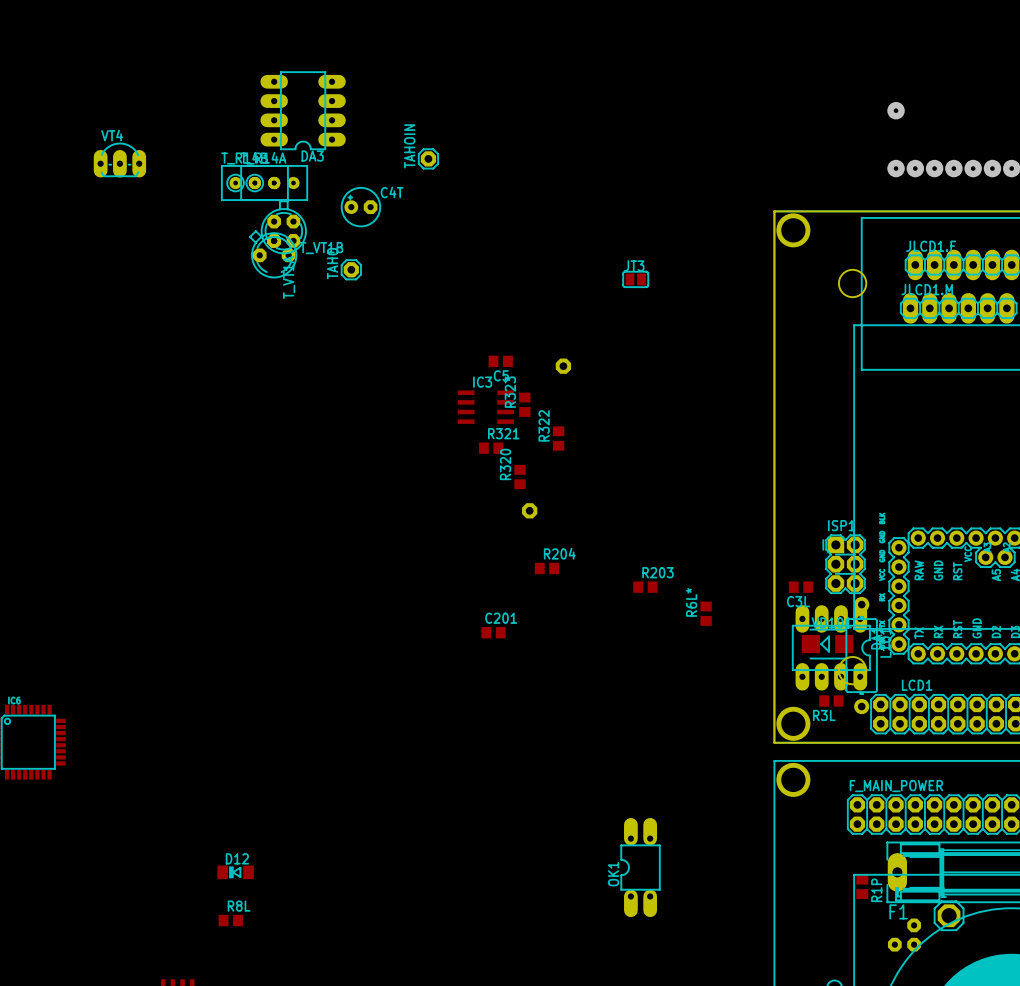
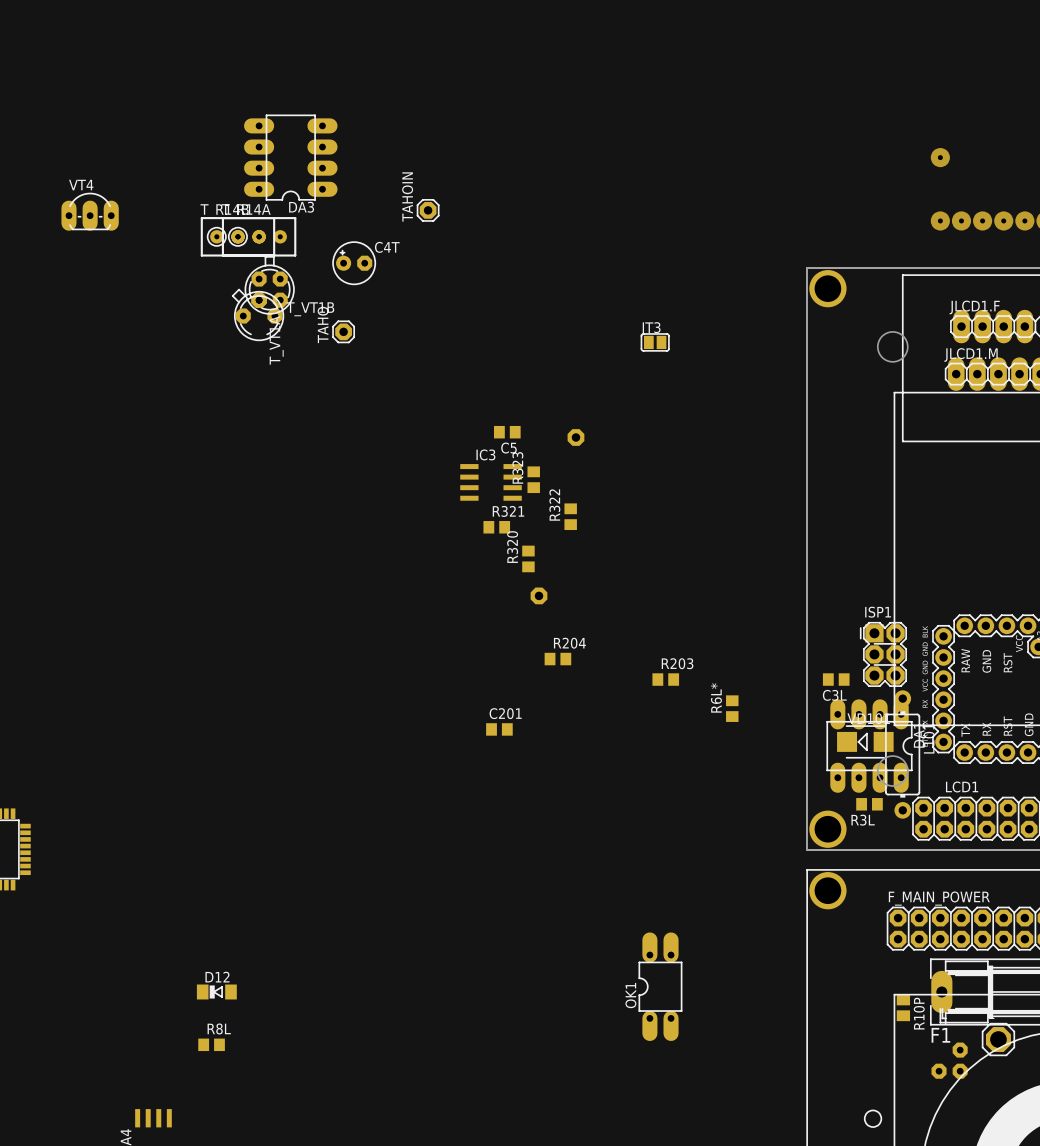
R1P name: R1P (876, 890) -> R10P (919, 1013)

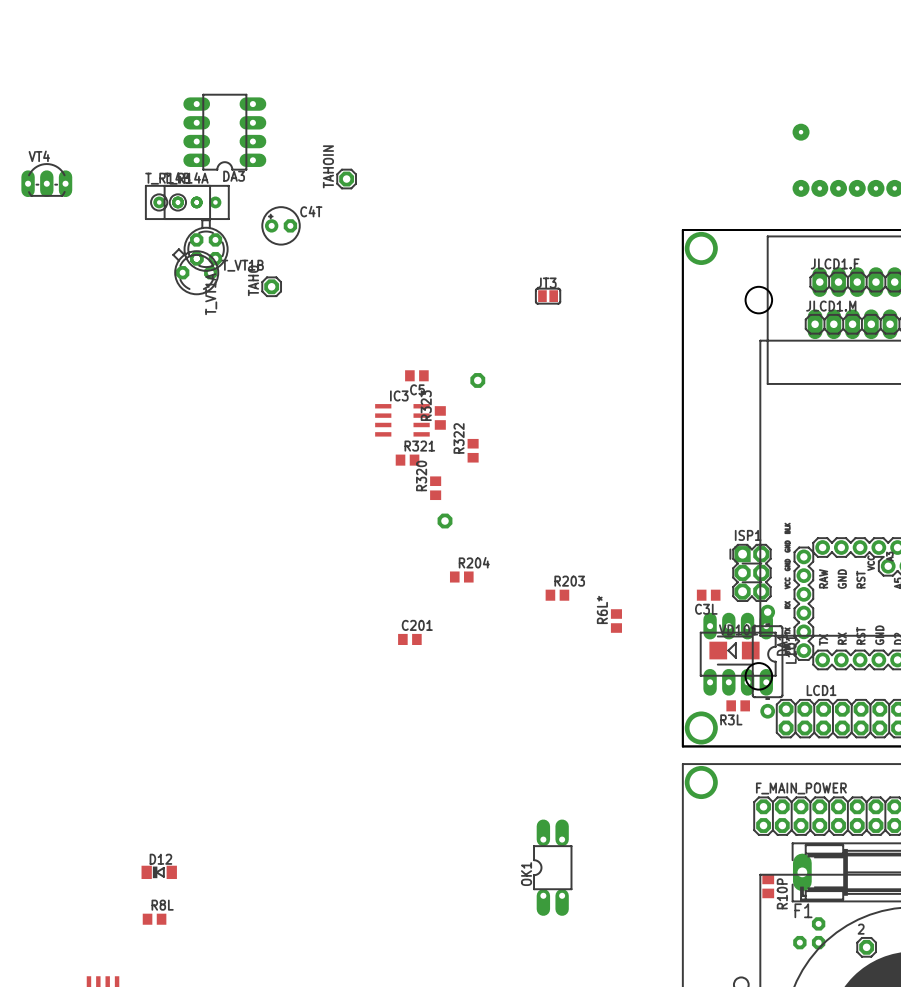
part: (998, 1039) -> none
2: none -> (866, 947)

